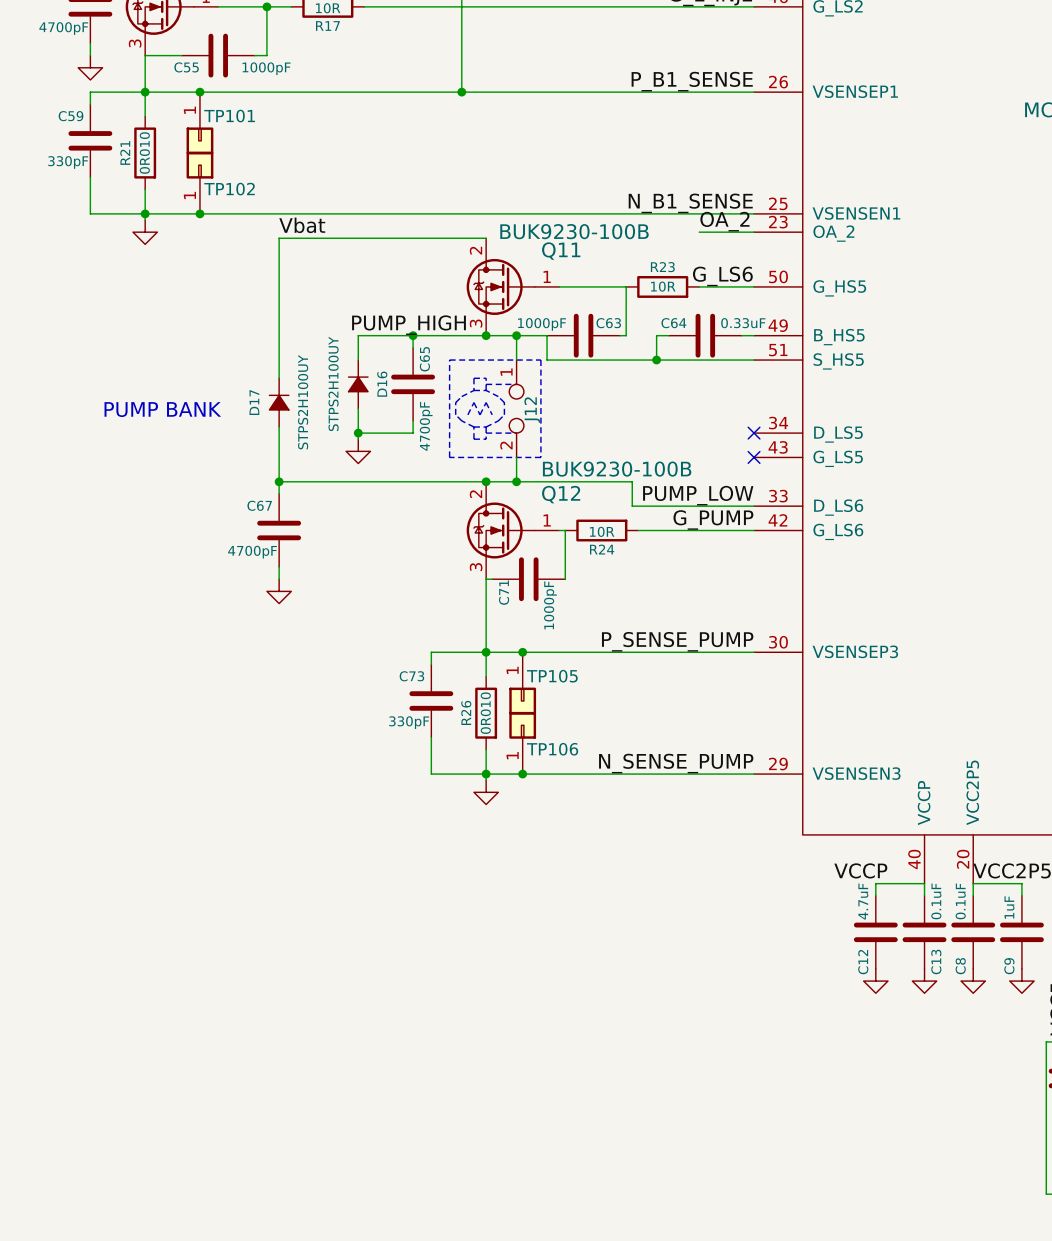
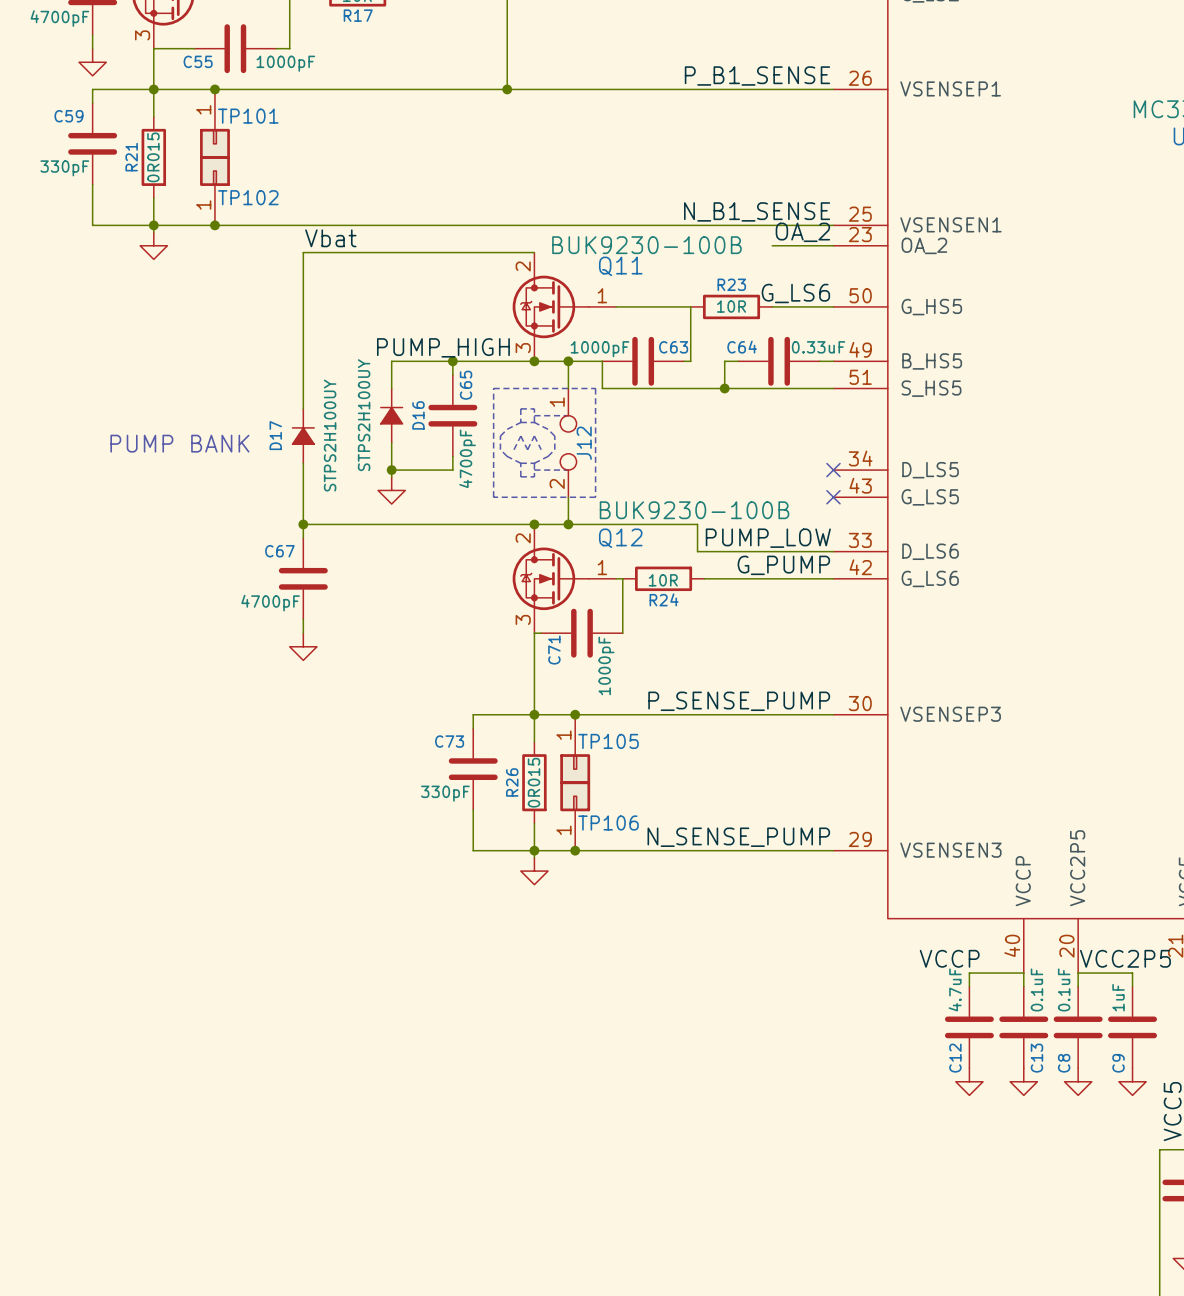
R21 value: 0R010 (144, 153) -> 0R015 (153, 157)
R26 value: 0R010 (485, 713) -> 0R015 (534, 782)

